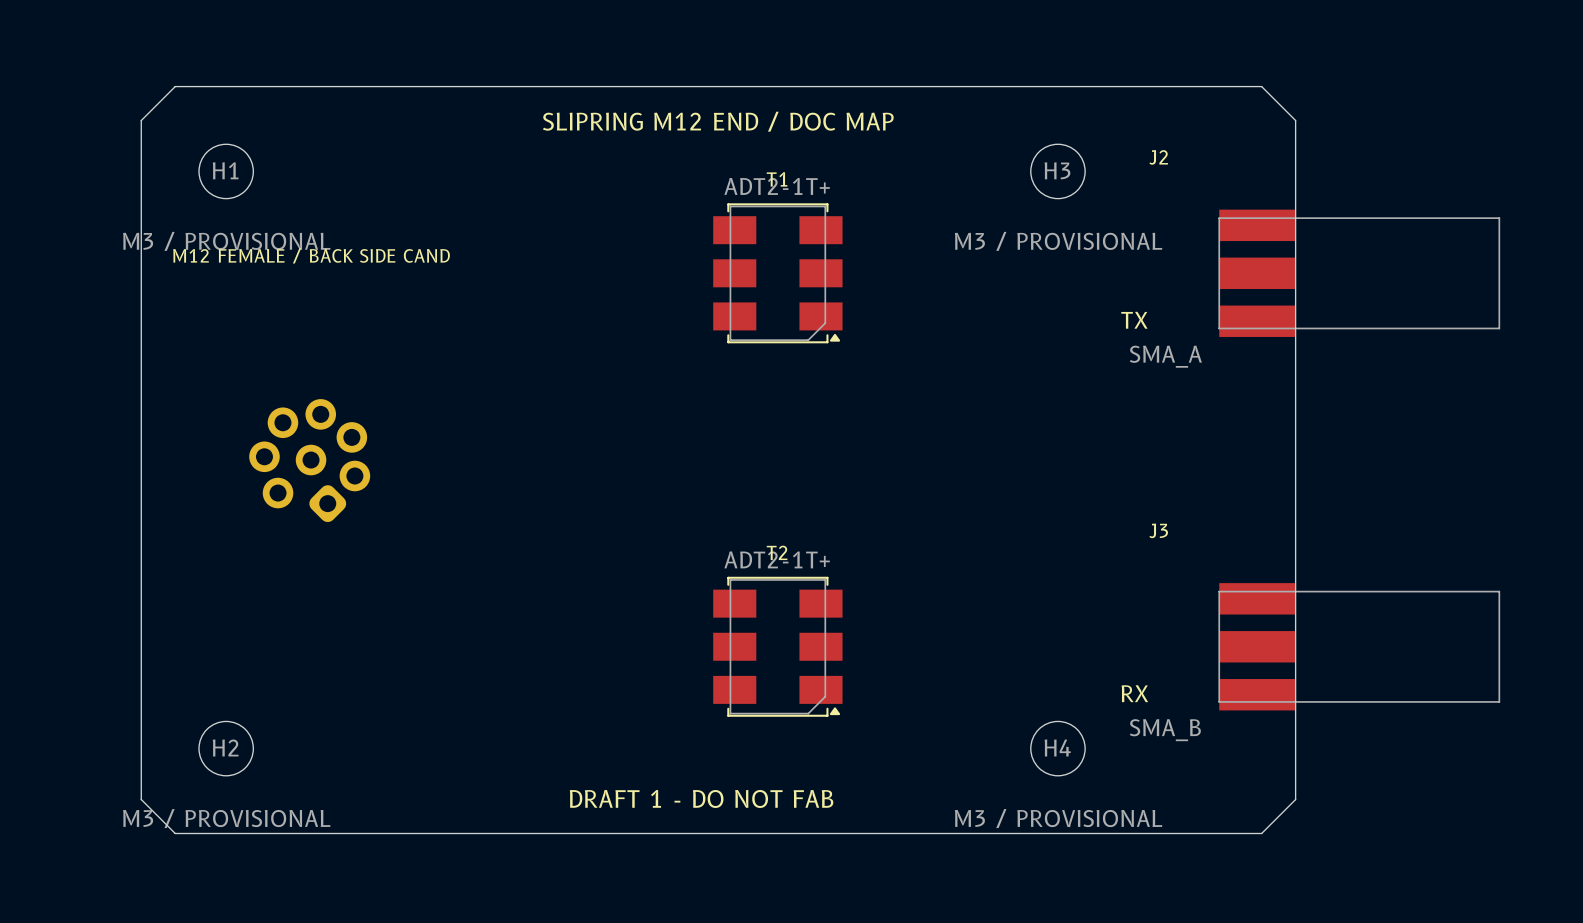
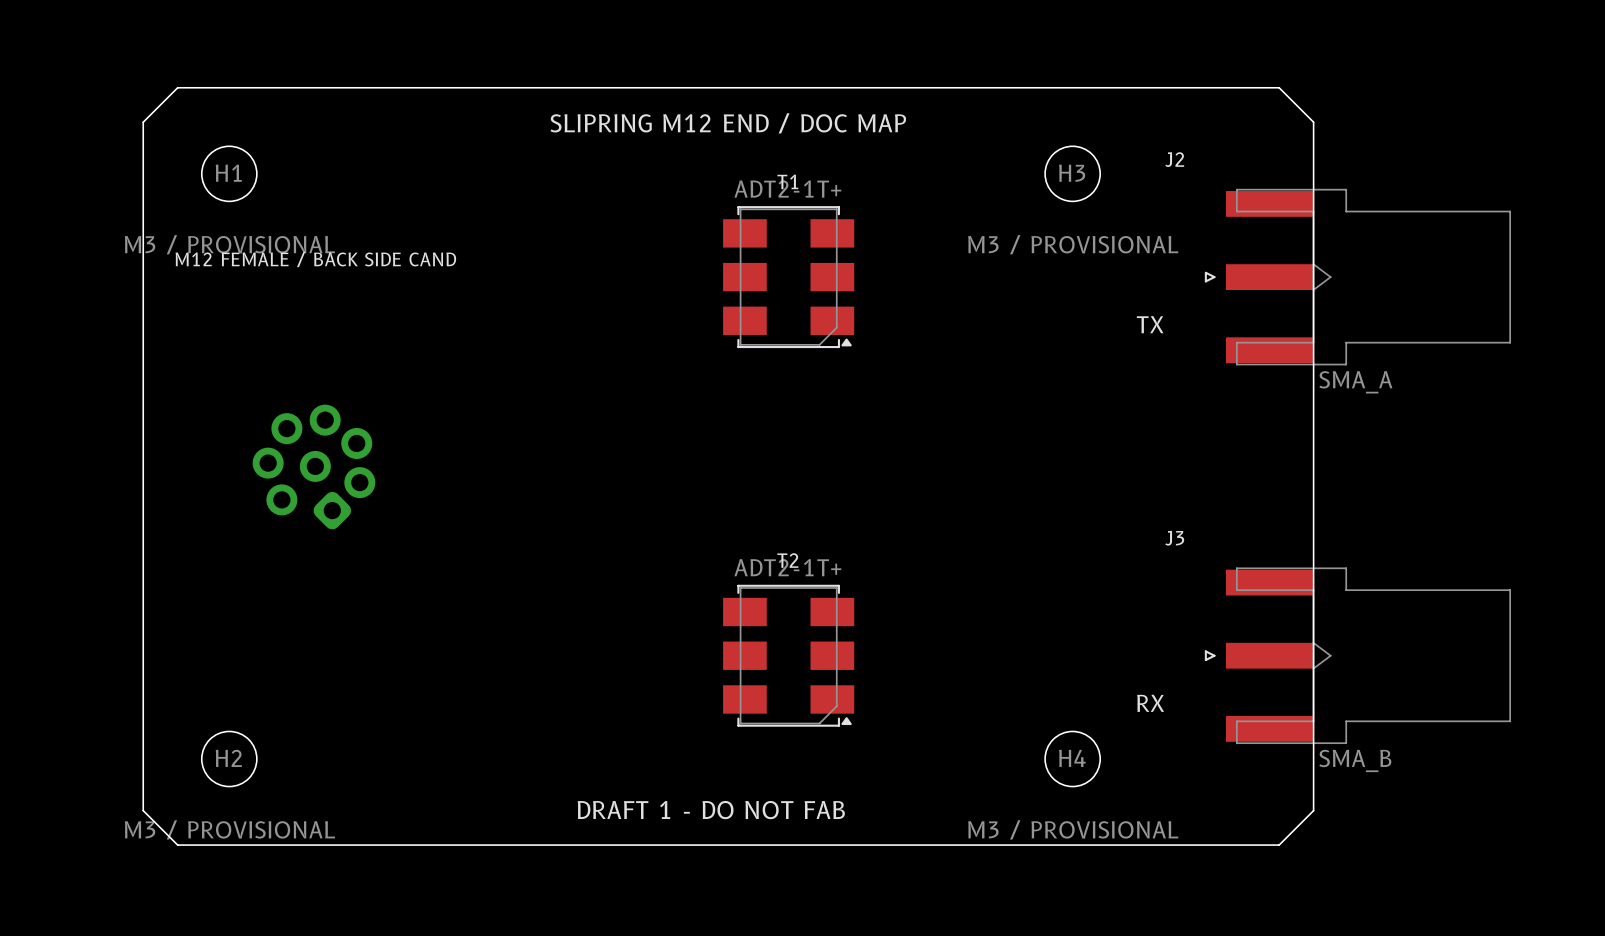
J2 footprint: [1218, 209, 1501, 337] -> [1204, 188, 1512, 366]
J2 value position: SMA_A (1165, 356) -> SMA_A (1355, 382)
J3 footprint: [1218, 583, 1501, 711] -> [1204, 567, 1512, 745]
J3 value position: SMA_B (1165, 730) -> SMA_B (1355, 760)

